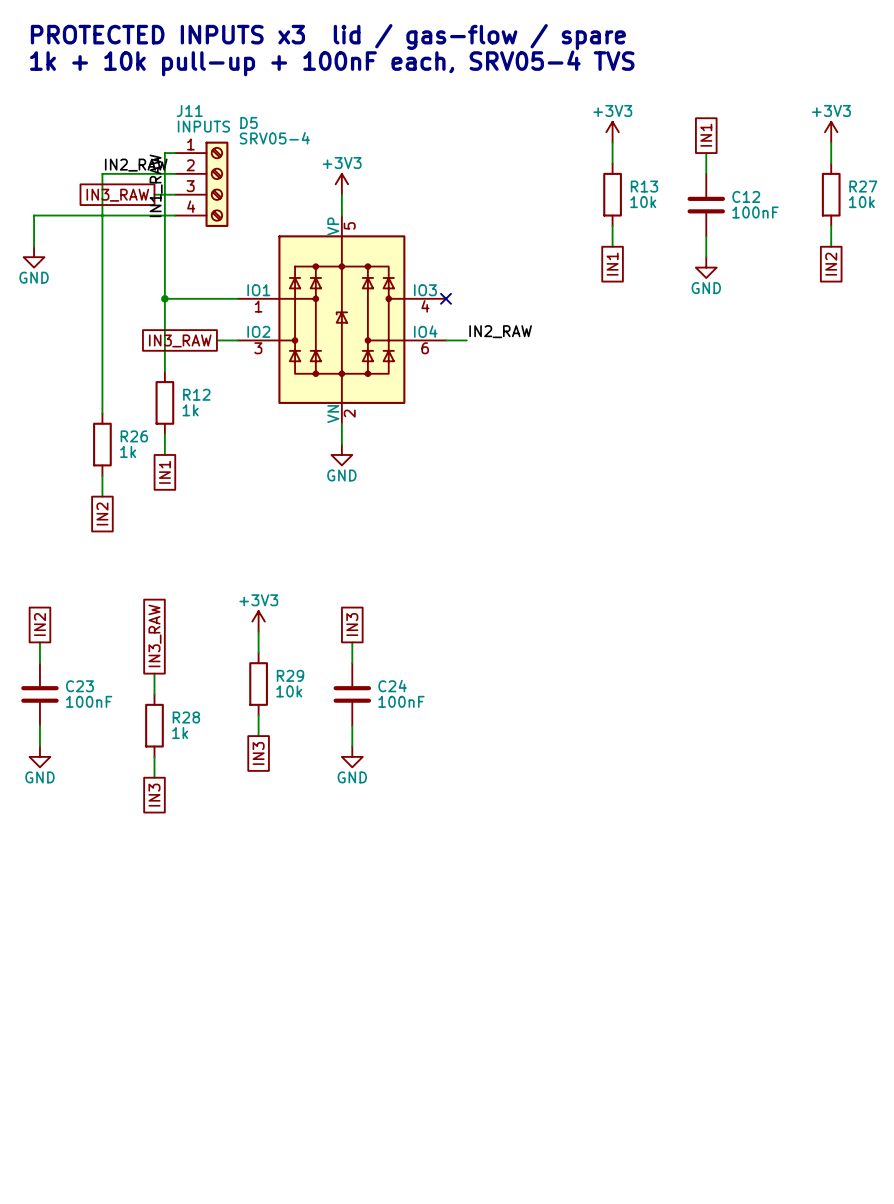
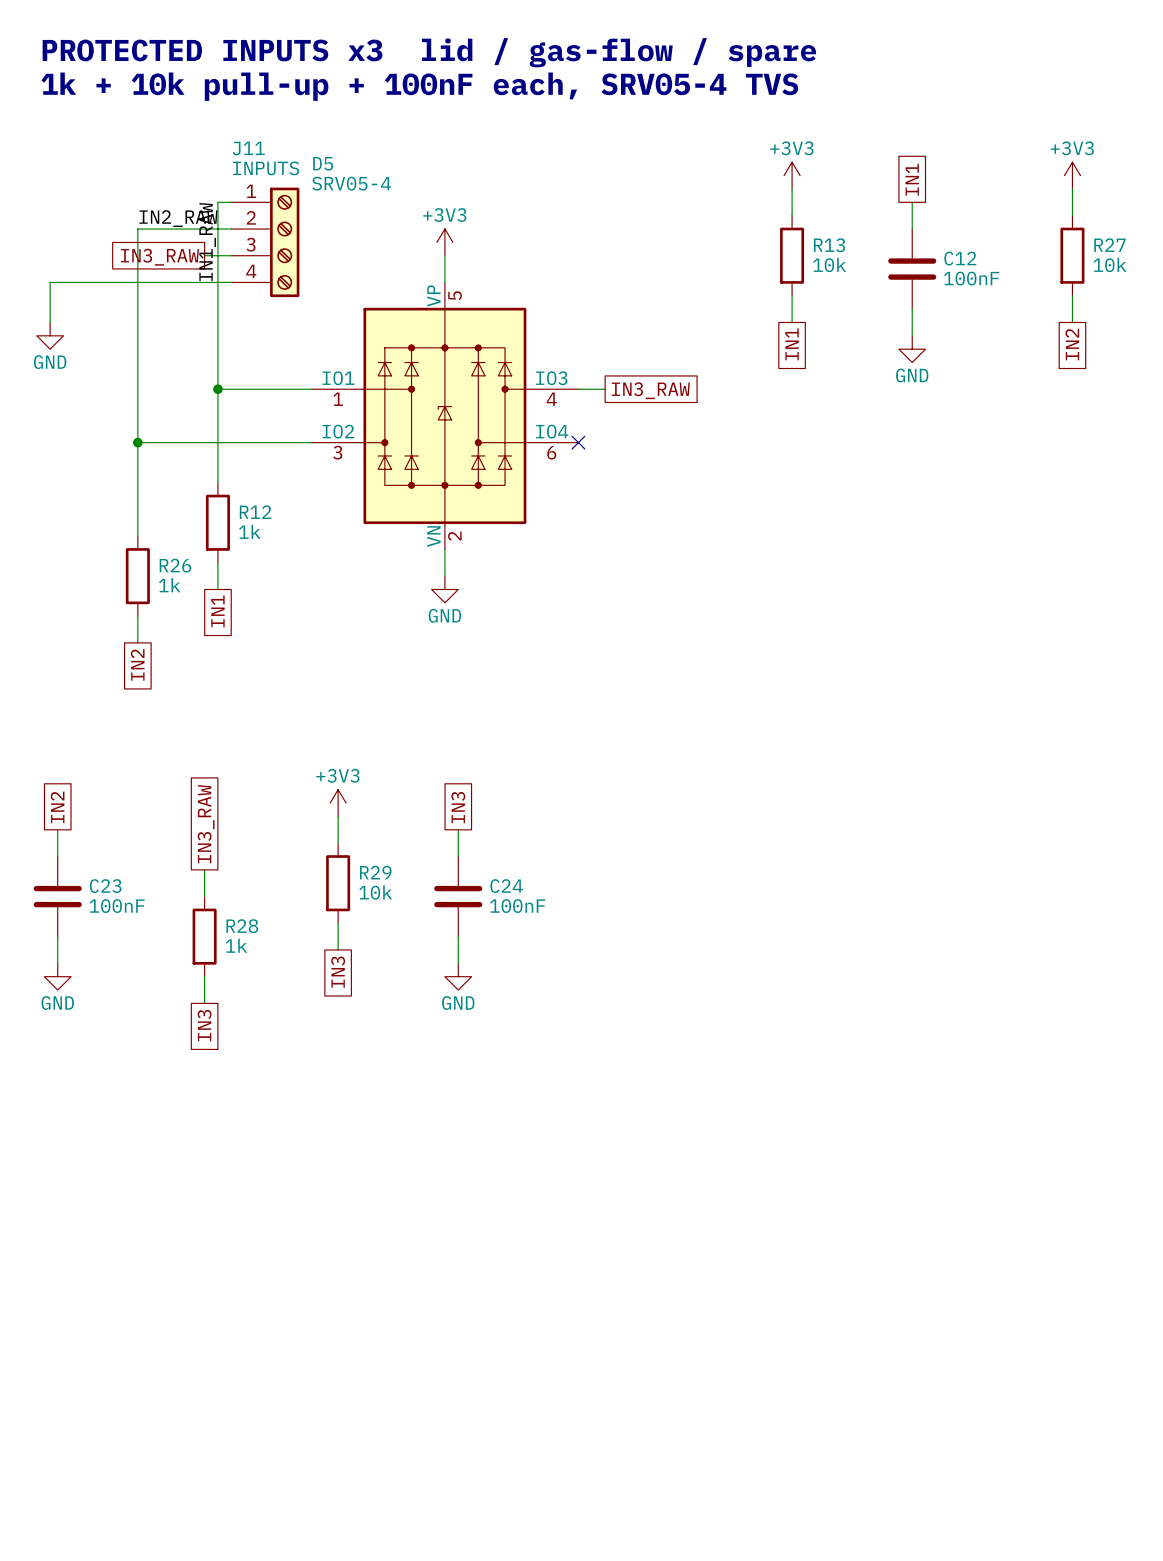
no-connect mark position: (446, 298) -> (578, 442)
global label: none -> IN3_RAW (650, 390)
label: IN2_RAW (500, 331) -> none
wire: none -> (137, 442) (284, 442)
junction: none -> (137, 442)
global label: IN3_RAW (180, 340) -> none
wire: (446, 340) (466, 340) -> (578, 389) (605, 389)

